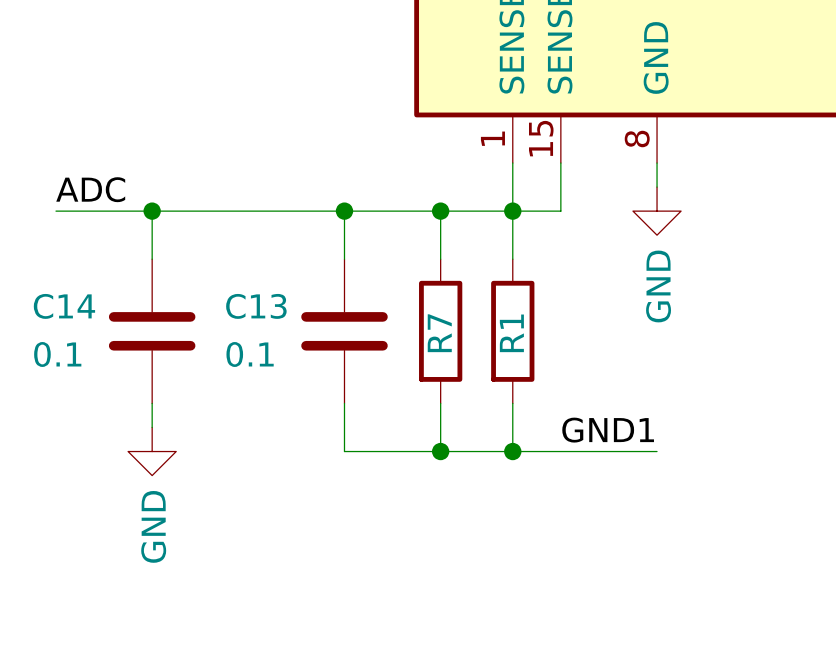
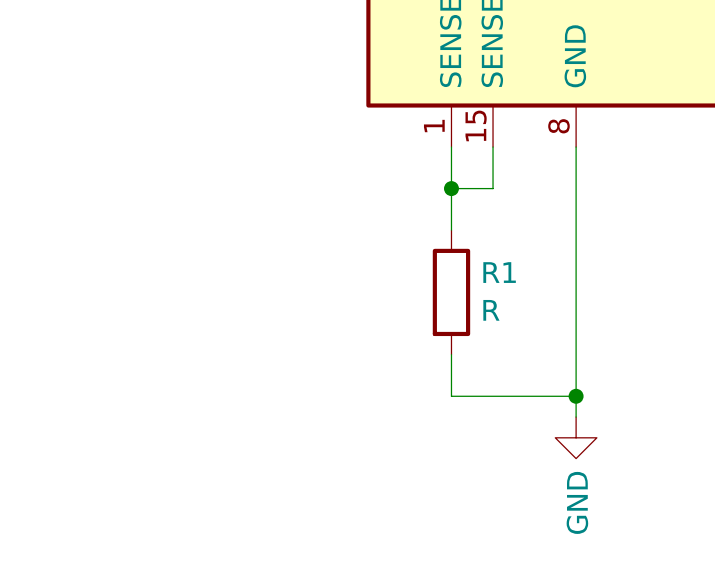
wire: none -> (576, 167) (576, 417)
label: ADC (90, 189) -> none
wire: (55, 211) (512, 211) -> none
wire: (152, 211) (152, 259) -> none
junction: (152, 211) -> none
wire: (344, 211) (344, 259) -> none
junction: (344, 211) -> none
wire: (440, 211) (440, 259) -> none
junction: (440, 211) -> none
power symbol: GND (657, 211) -> none
C14: 0.1 (152, 331) -> none
C13: 0.1 (344, 331) -> none
R7: (440, 331) -> none
R1 name rotation: 0° (511, 333) -> 90° clockwise (499, 272)
R1 name position: R1 (511, 333) -> R1 (499, 272)
R1 value: none -> R (491, 310)
wire: (152, 403) (152, 427) -> none
wire: (344, 403) (344, 451) (512, 451) -> none
wire: (440, 403) (440, 451) -> none
label: GND1 (608, 430) -> none
power symbol: GND (152, 451) -> none
junction: (440, 451) -> none
junction: (512, 451) -> none
junction: none -> (576, 396)
power symbol: none -> GND (576, 437)

